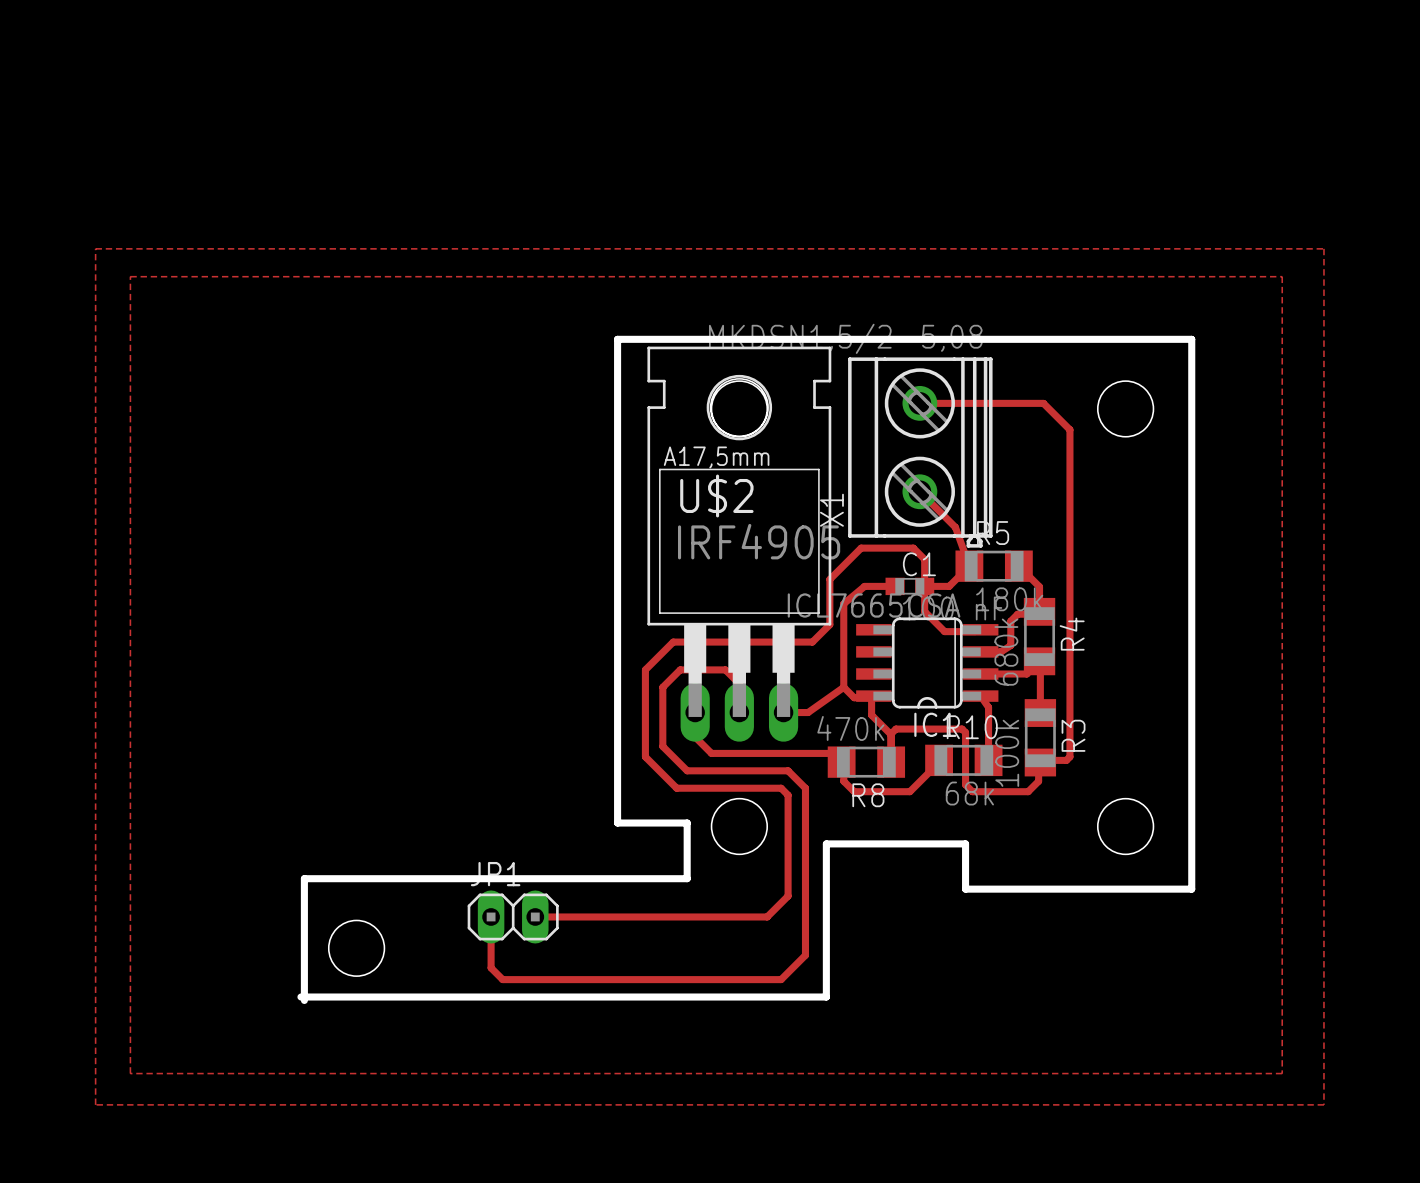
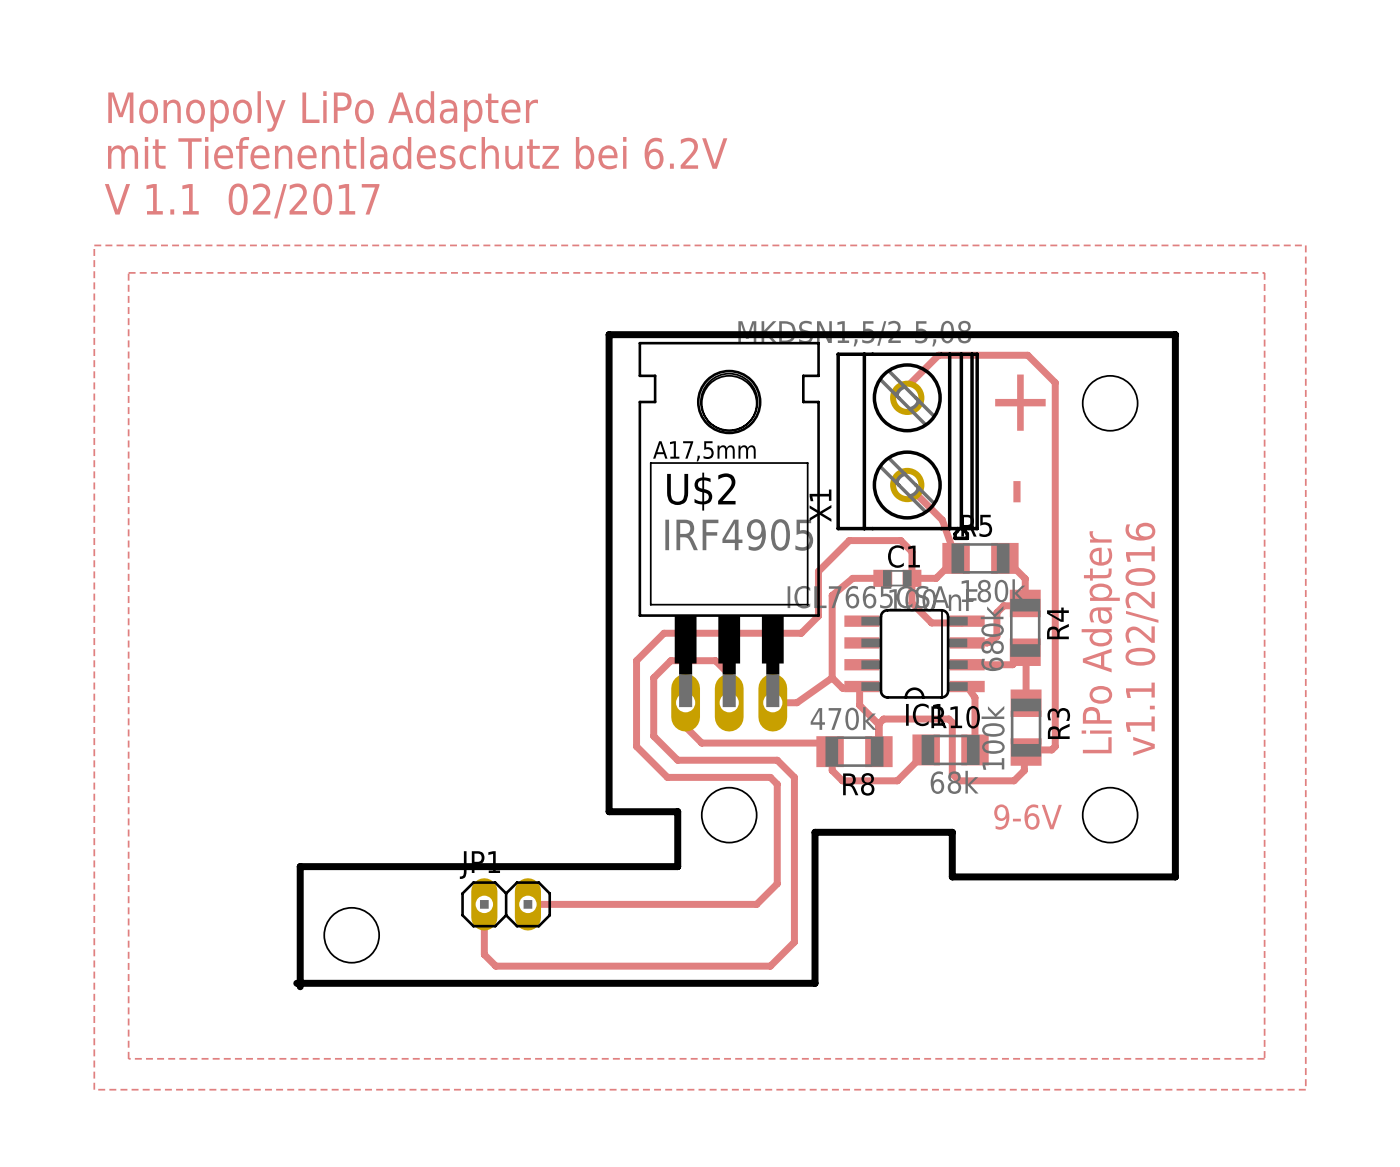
text: none -> Monopoly LiPo Adapter (323, 111)
text: none -> mit Tiefenentladeschutz bei 6.2V (417, 153)
text: none -> V 1.1 02/2017 (242, 200)
track: (919, 403) (1043, 403) (1069, 429) -> (907, 397) (907, 386) (938, 355) (1027, 355) (1055, 382) (1055, 423)
text: none -> + (1020, 402)
text: none -> - (1016, 491)
text: none -> v1.1 02/2016 (1141, 639)
text: none -> LiPo Adapter (1100, 642)
text: none -> 9-6V (1028, 817)

